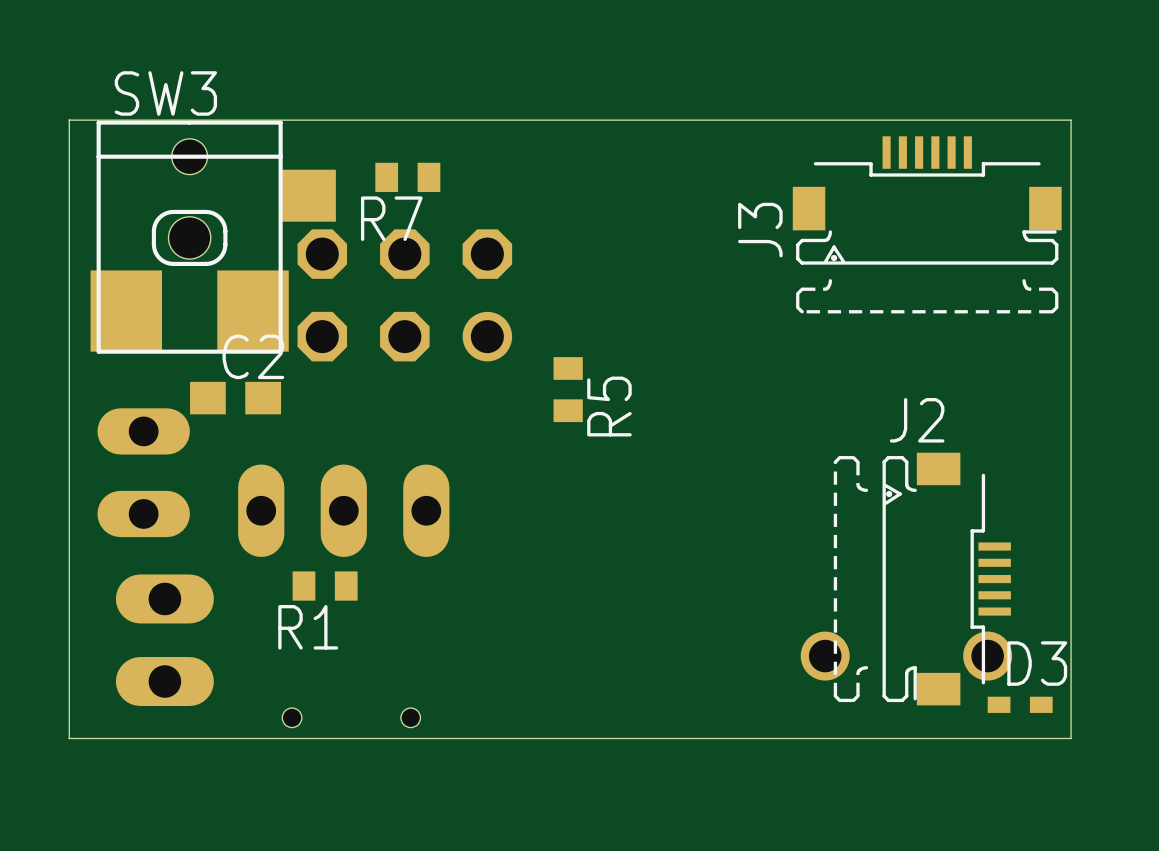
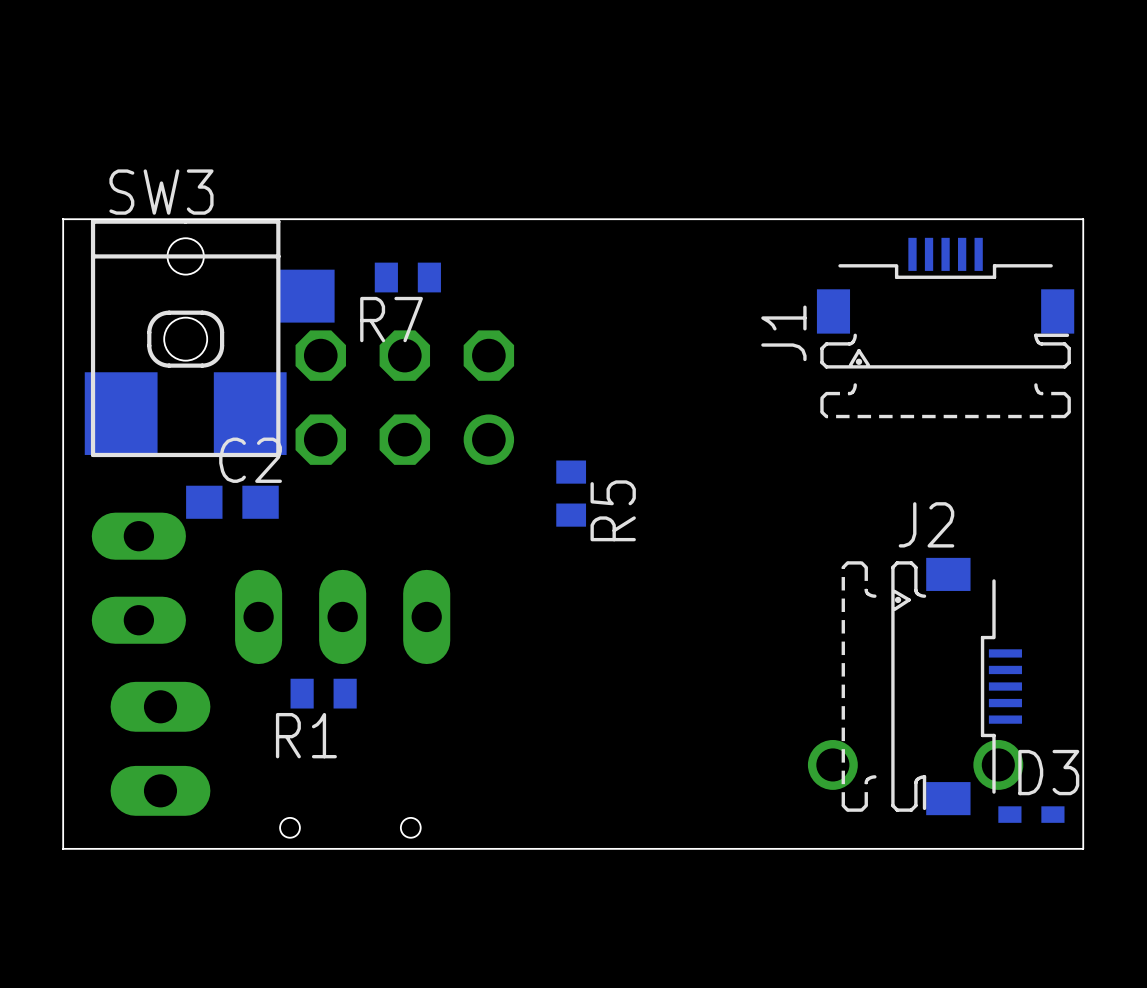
J3: (927, 224) -> none
J1: none -> (945, 328)

